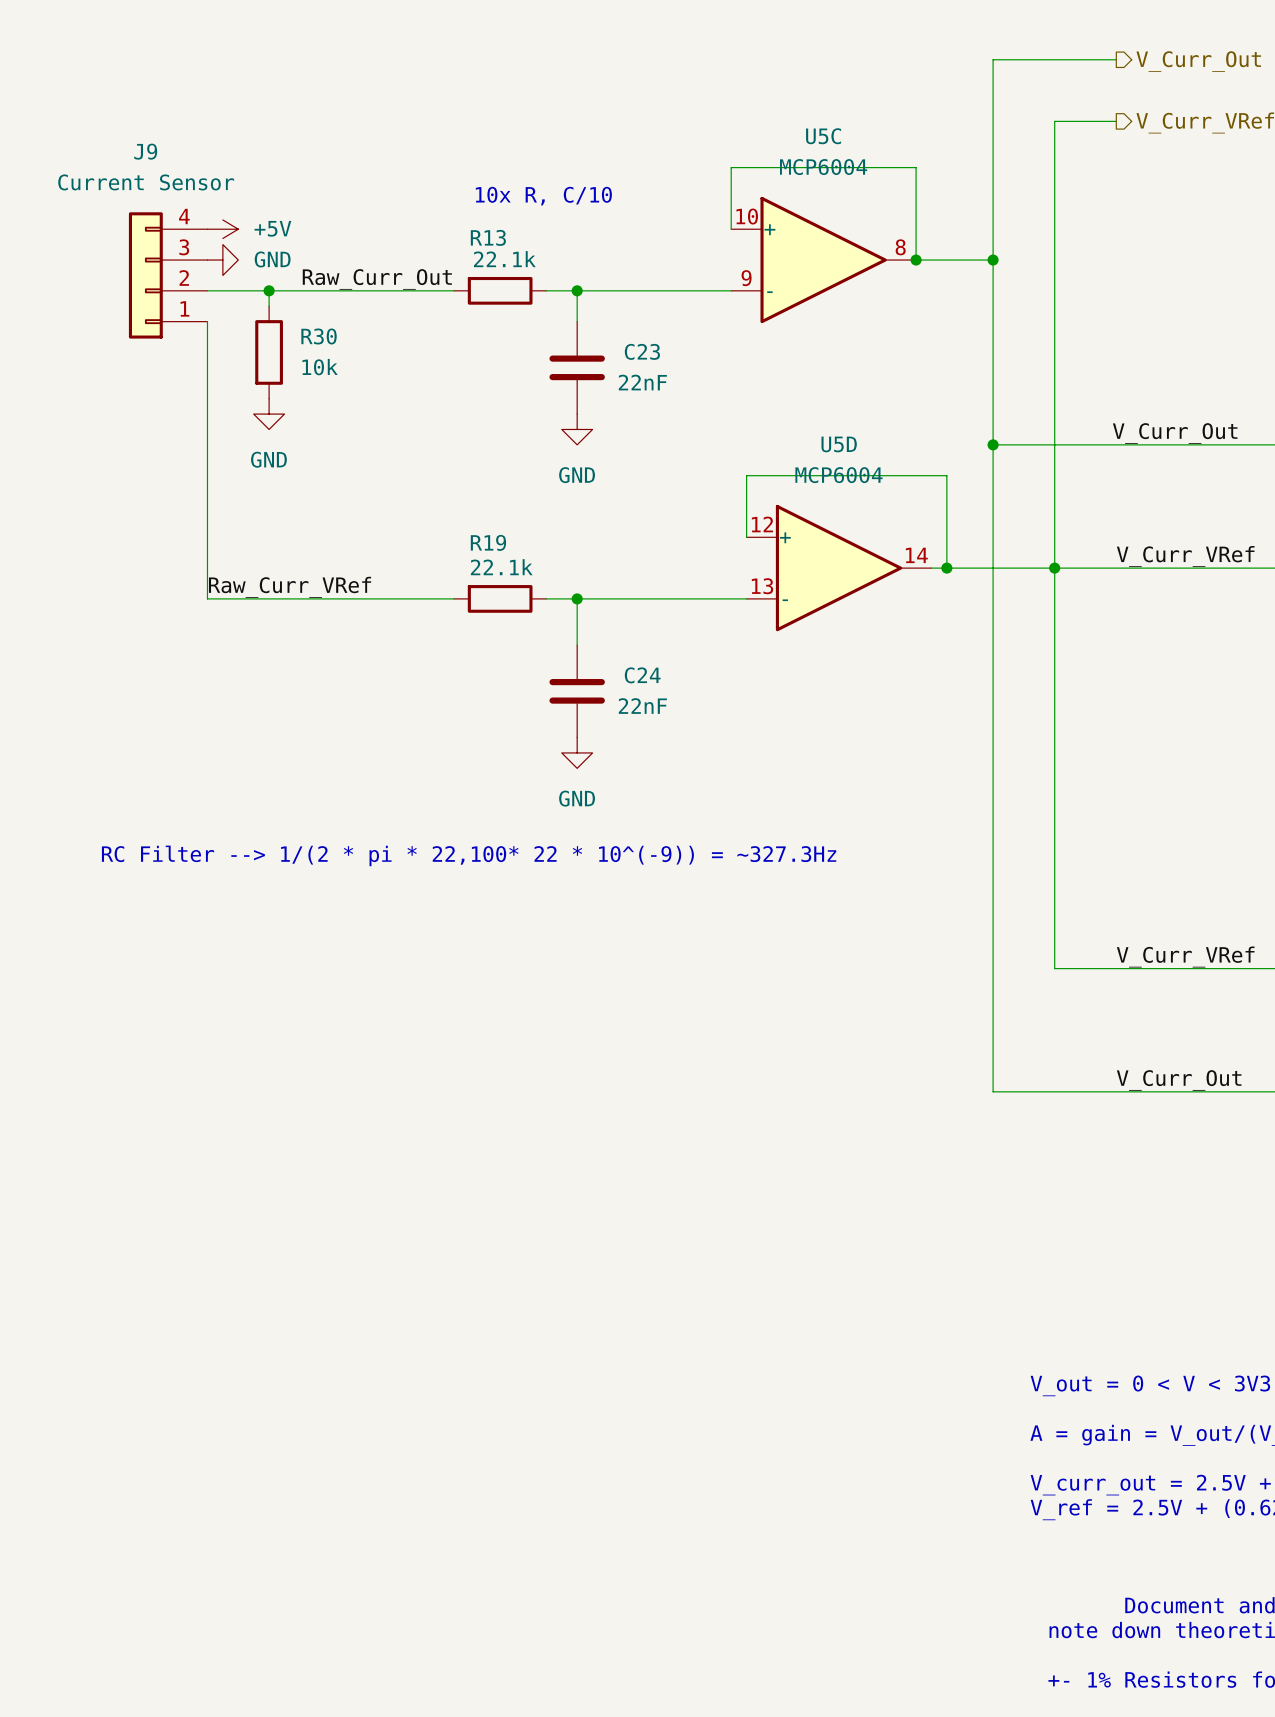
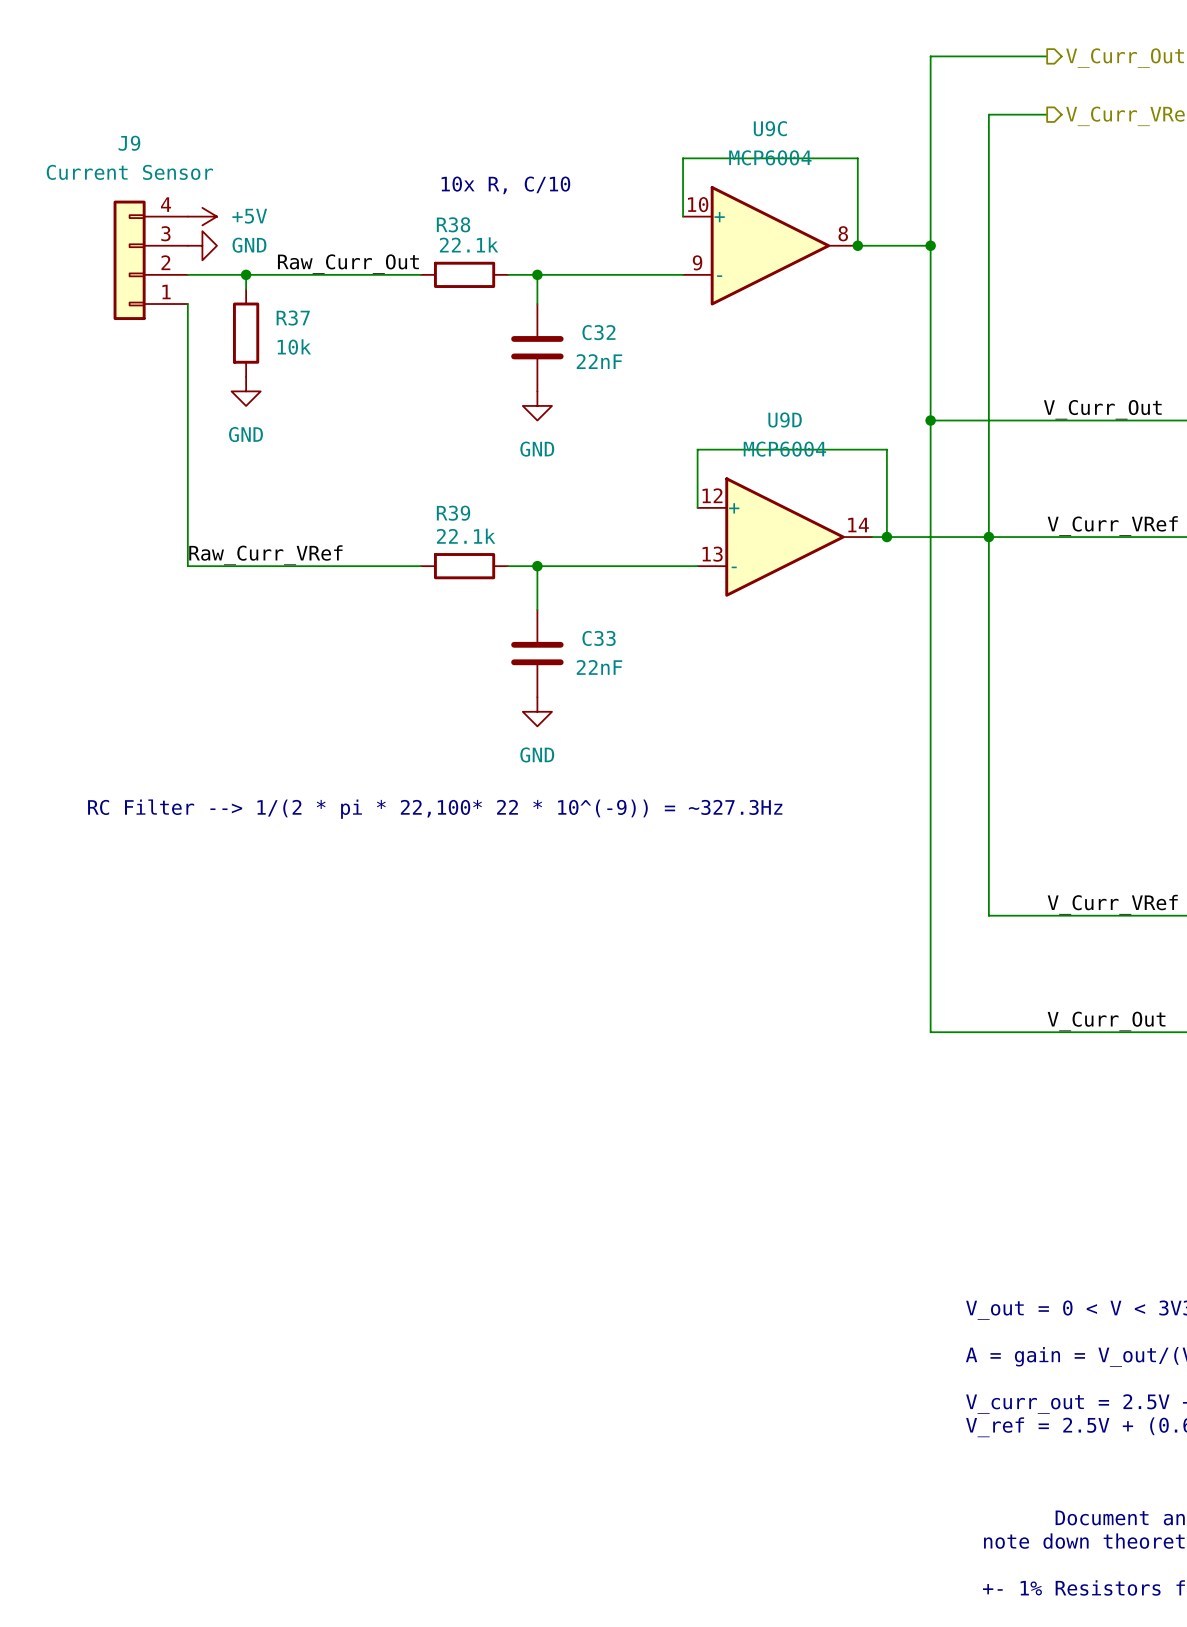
U5C name: U5C (823, 136) -> U9C (770, 128)
R13 name: R13 (488, 237) -> R38 (453, 224)
R30 name: R30 (319, 336) -> R37 (293, 318)
C23 name: C23 (642, 351) -> C32 (598, 332)
U5D name: U5D (839, 444) -> U9D (785, 419)
R19 name: R19 (488, 542) -> R39 (453, 513)
C24 name: C24 (642, 675) -> C33 (599, 638)

